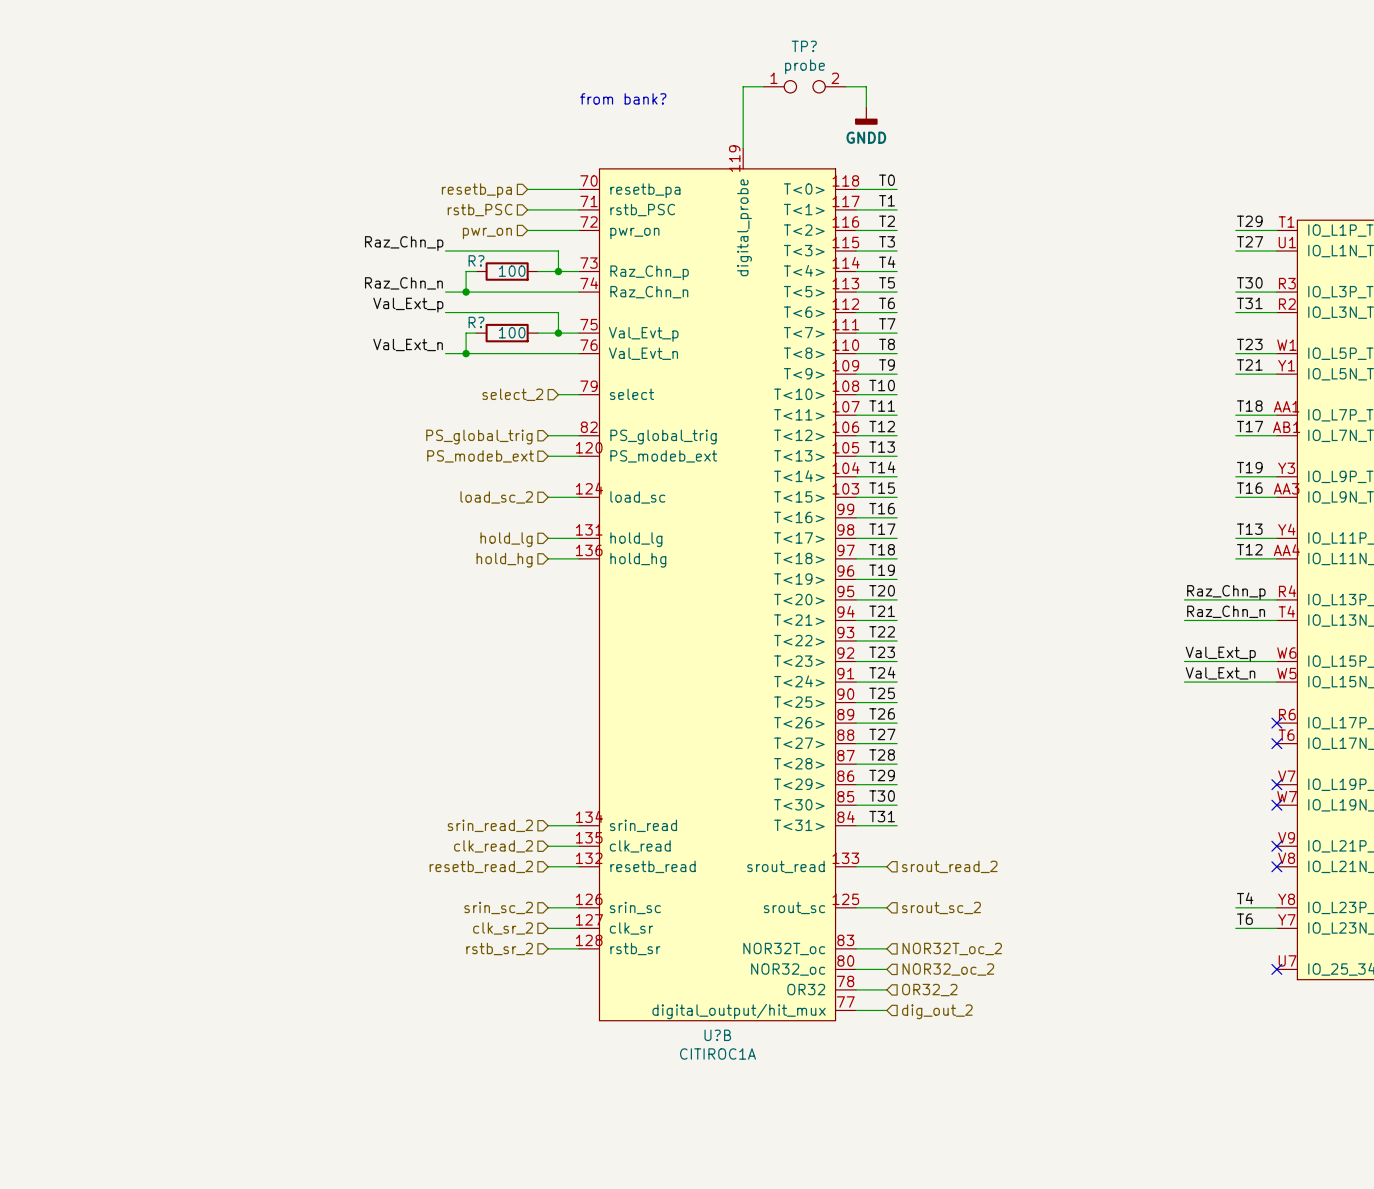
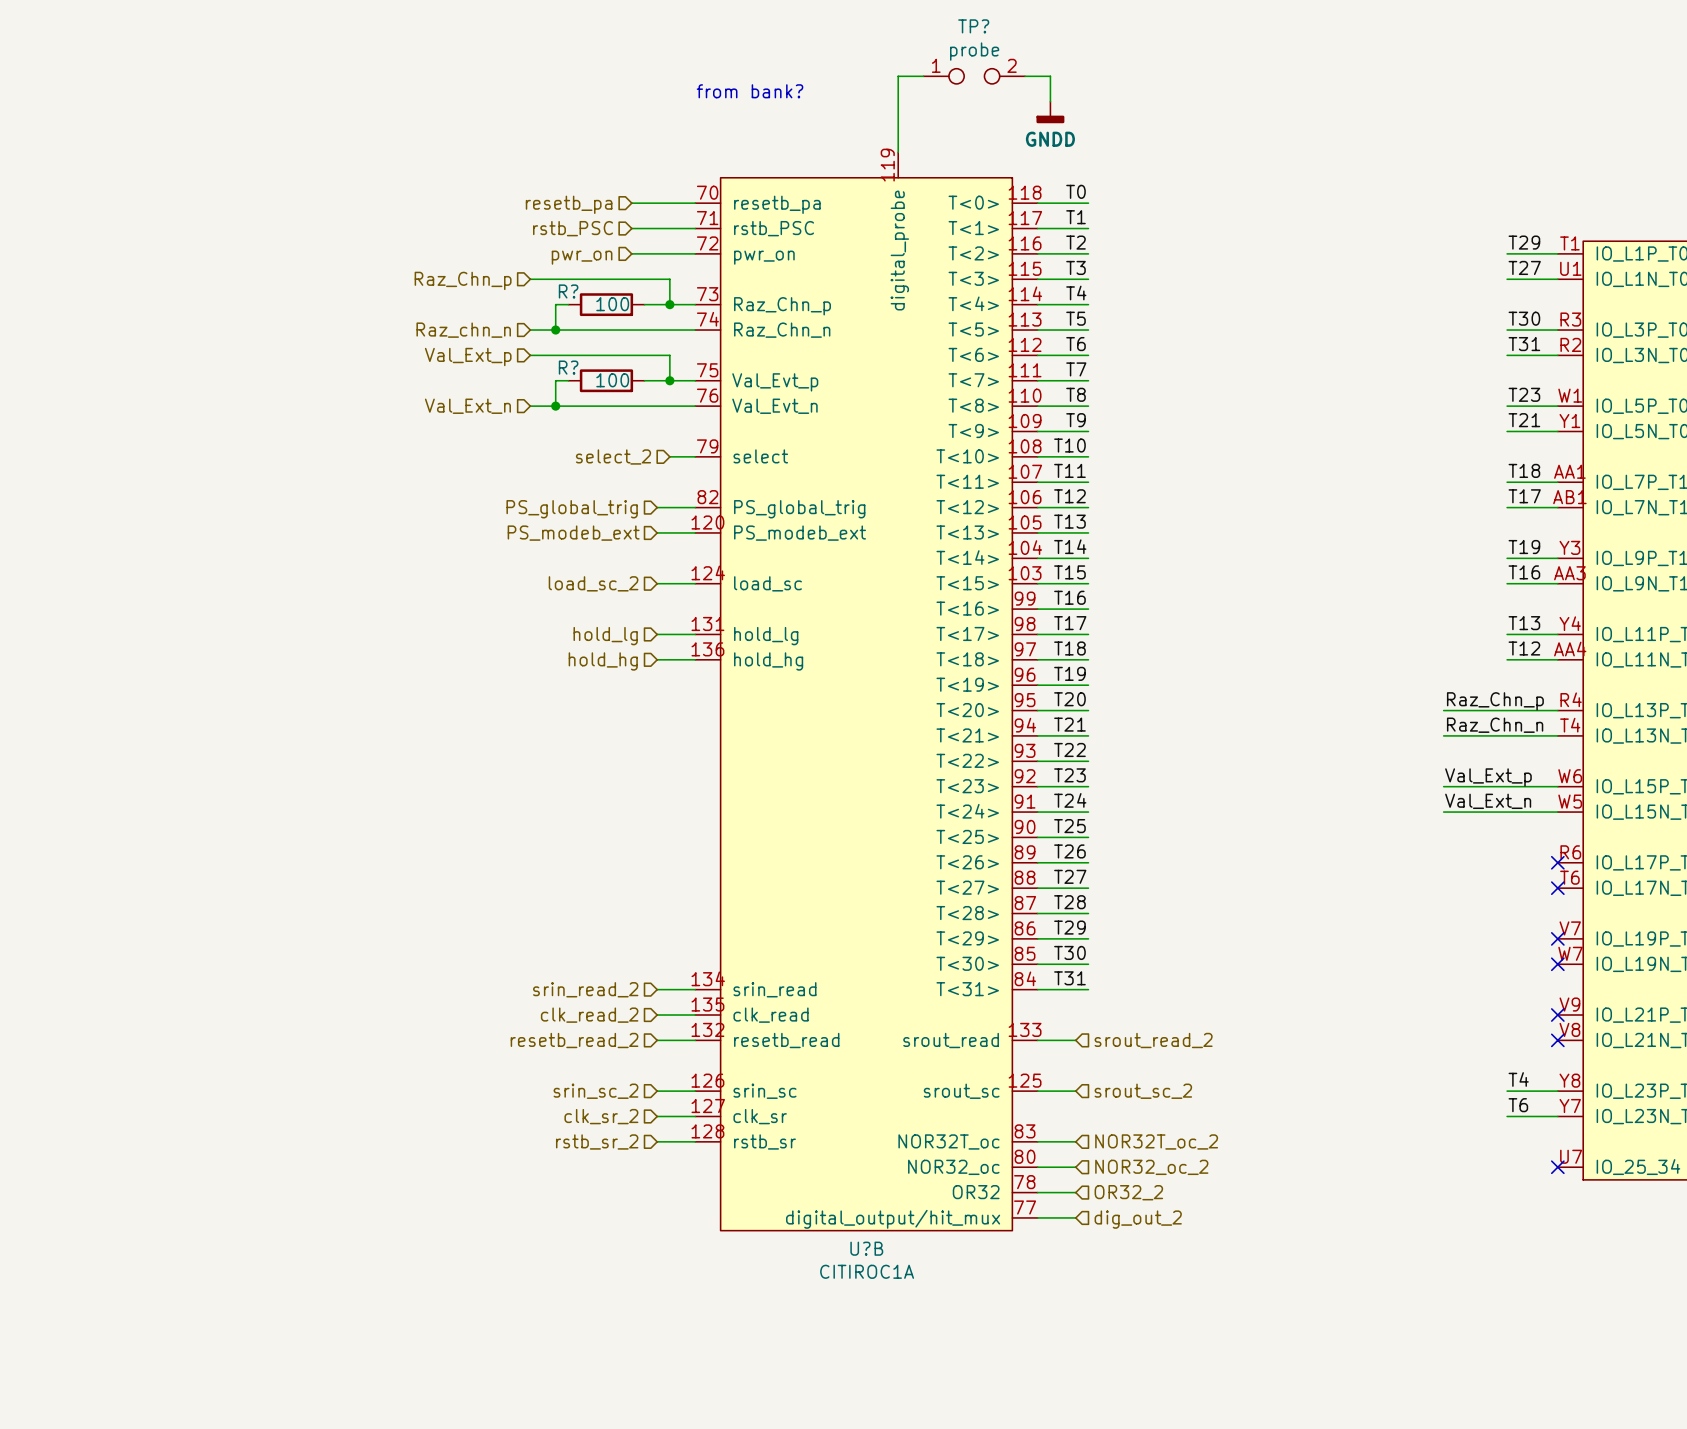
label: Raz_Chn_p (404, 243) -> none
hierarchical label: none -> Raz_Chn_p (463, 280)
label: Raz_Chn_n (403, 283) -> none
hierarchical label: none -> Raz_chn_n (463, 330)
label: Val_Ext_p (408, 305) -> none
hierarchical label: none -> Val_Ext_p (468, 357)
label: Val_Ext_n (408, 344) -> none
hierarchical label: none -> Val_Ext_n (467, 406)

